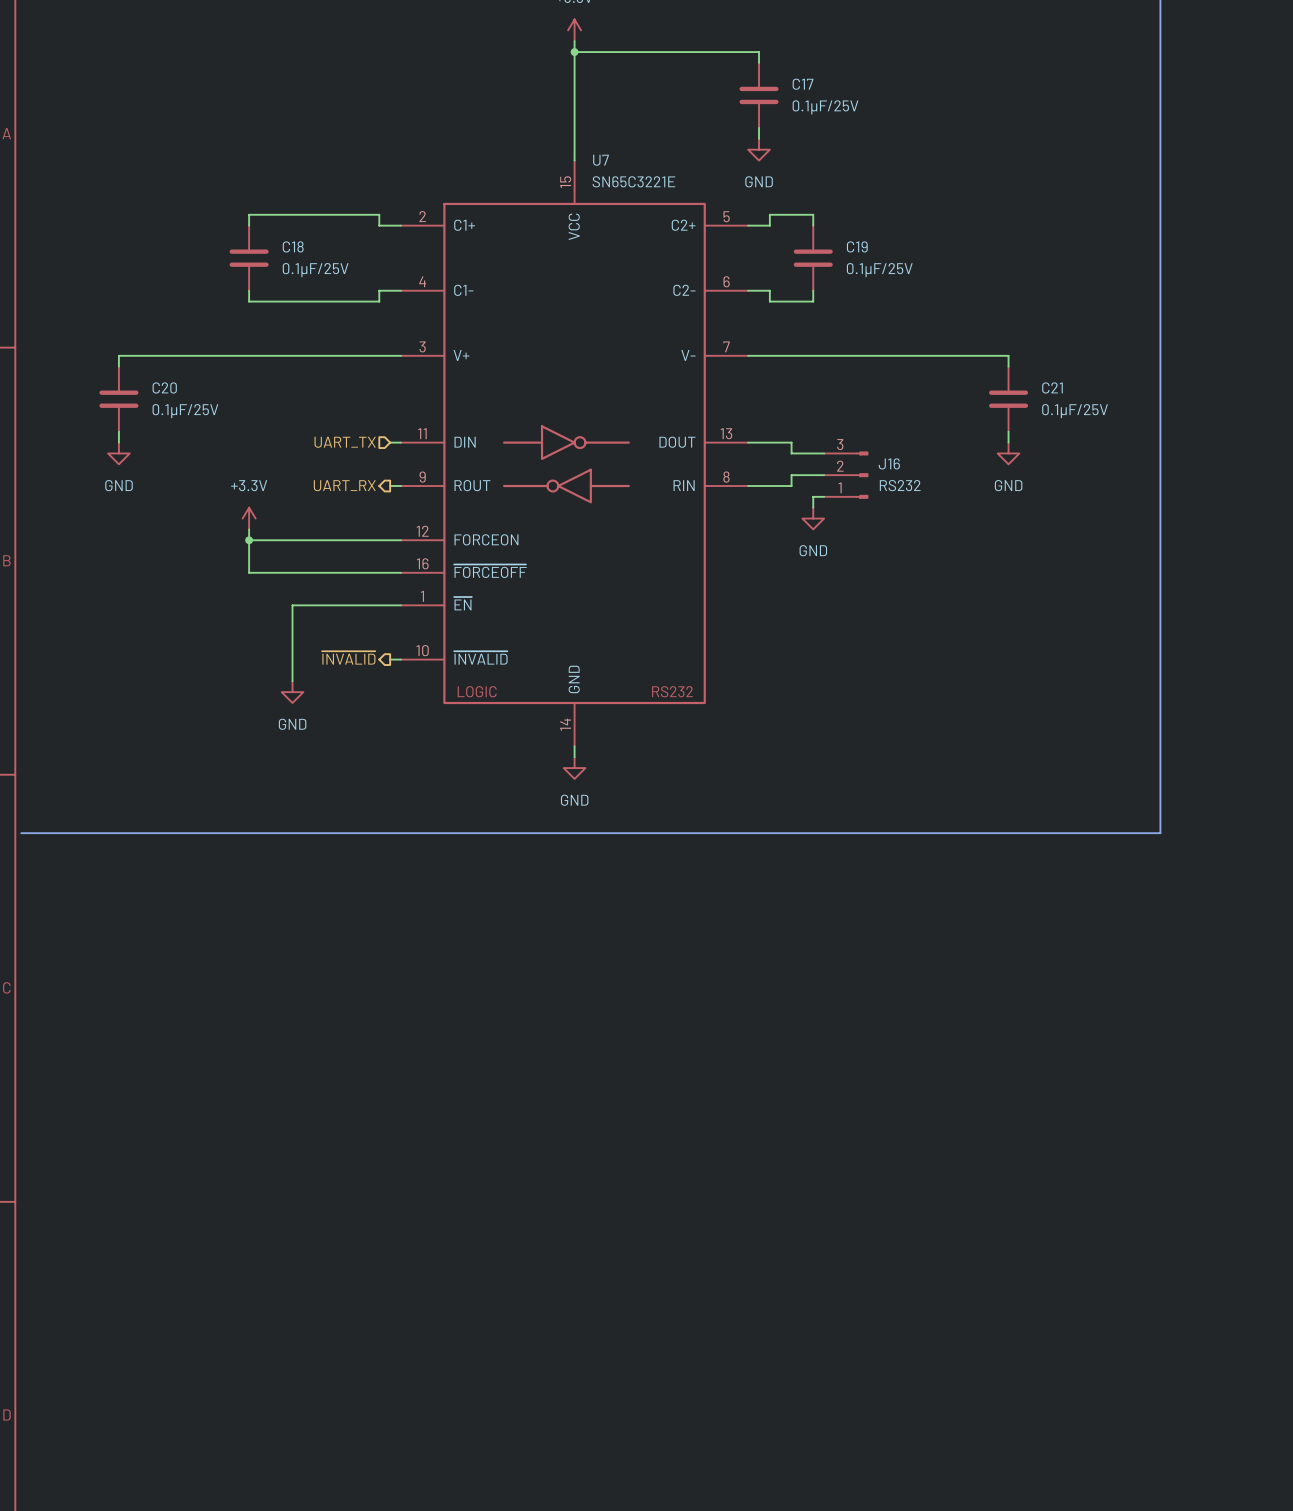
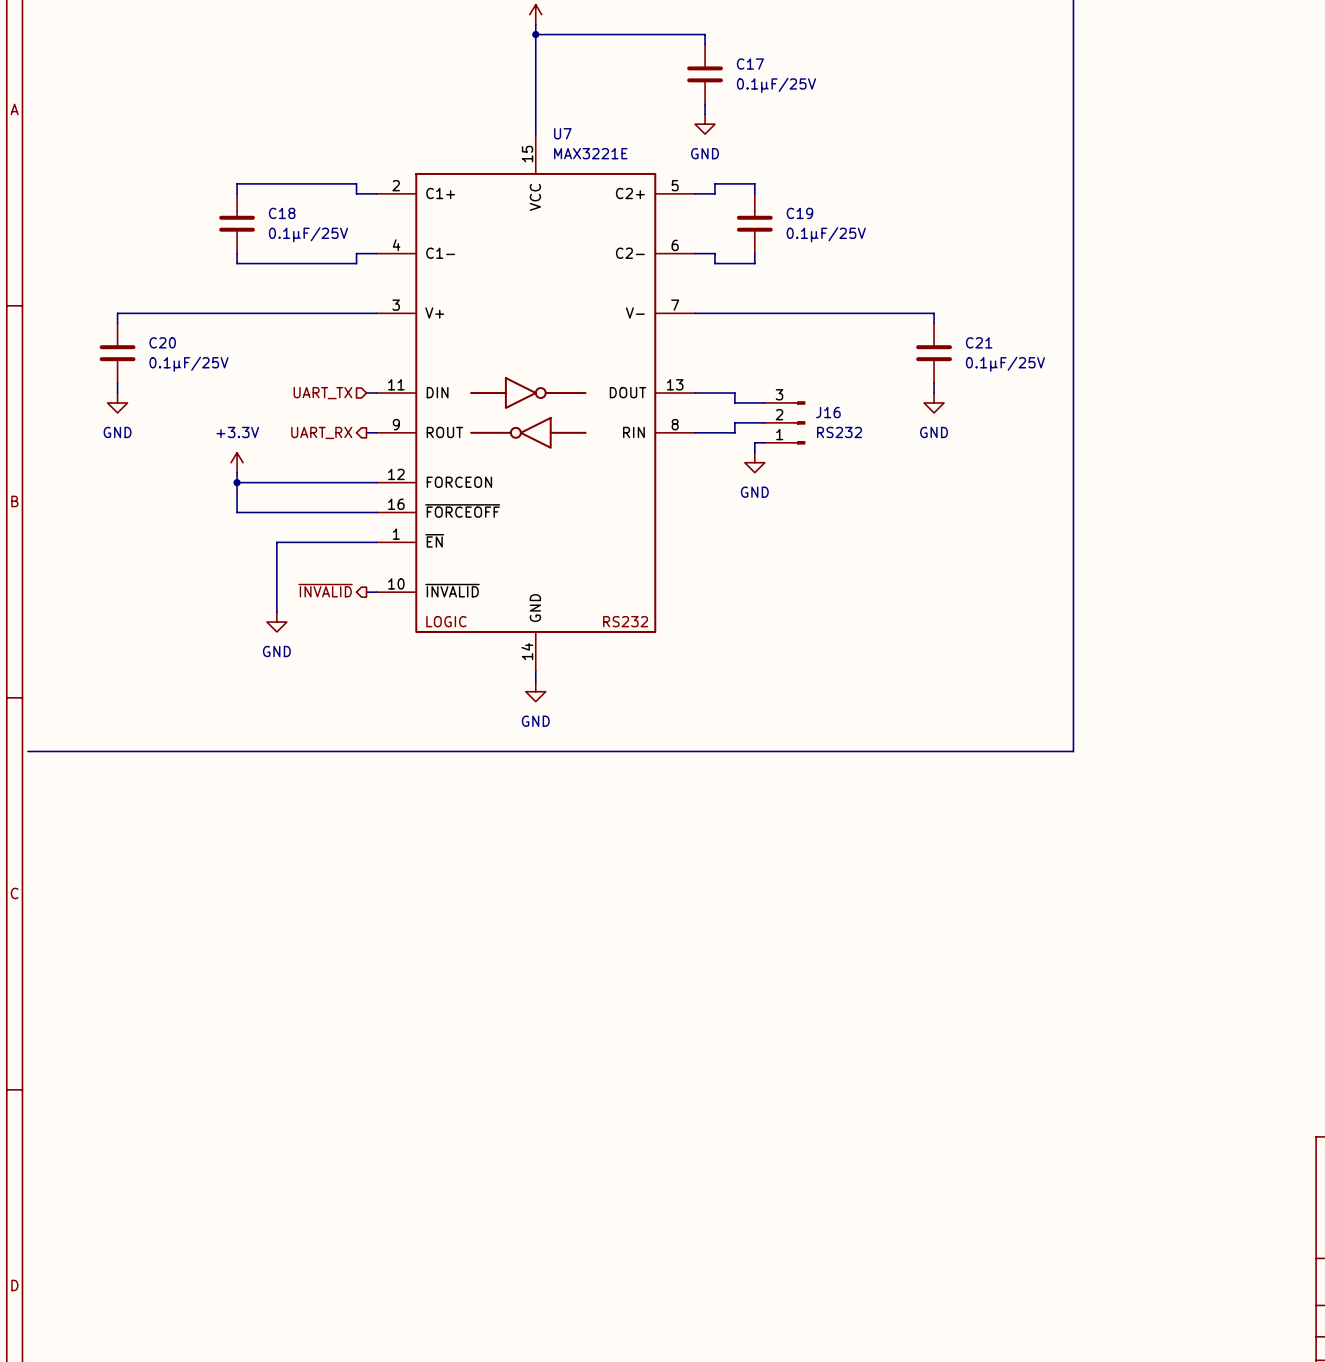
U7 value: SN65C3221E (633, 181) -> MAX3221E (590, 153)

